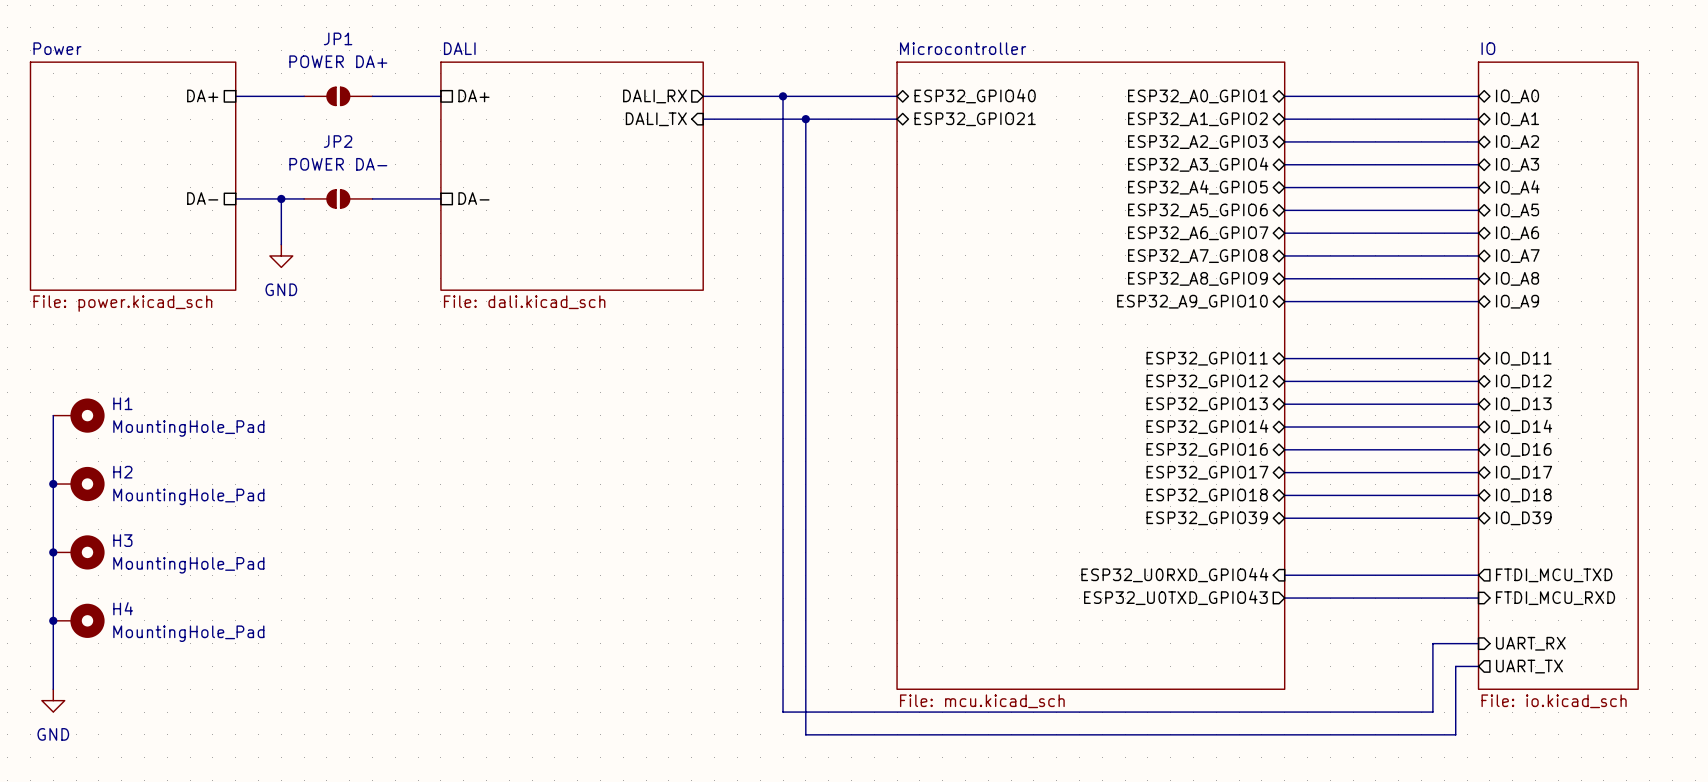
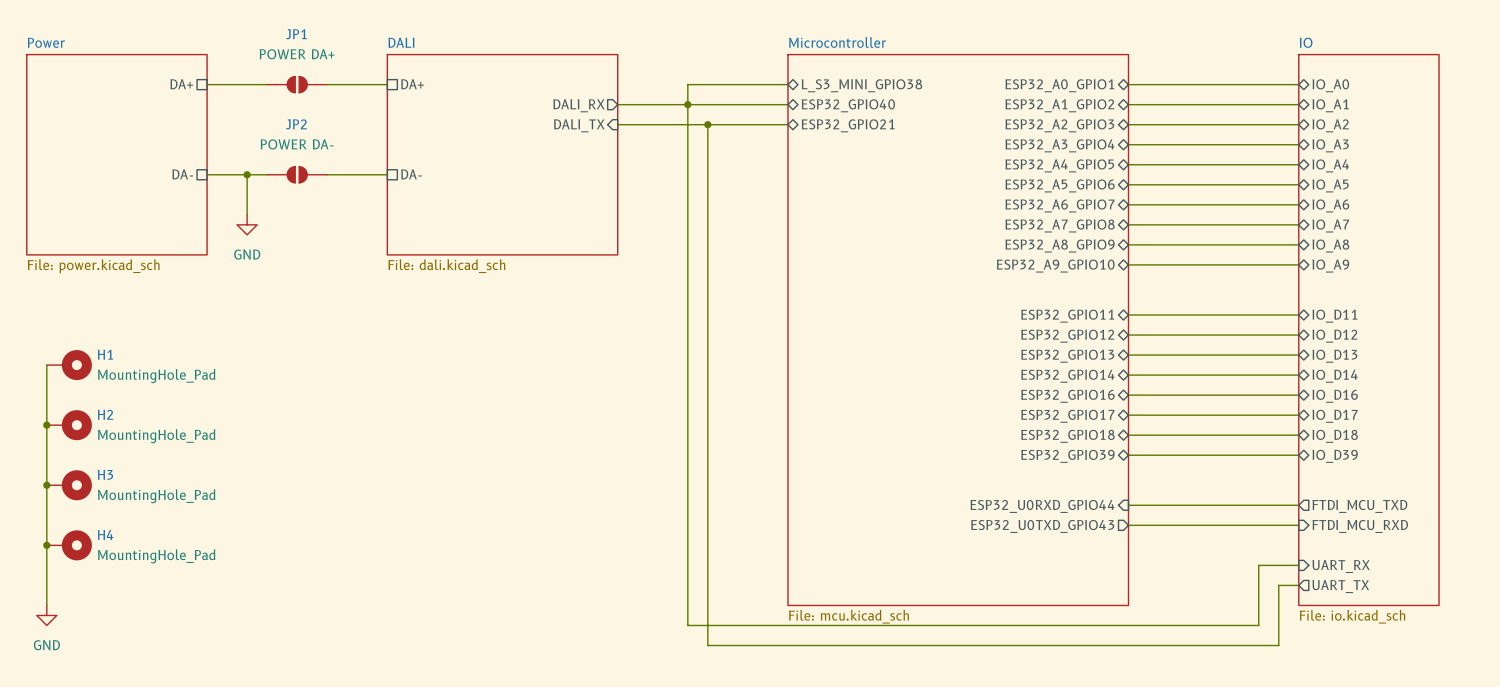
sheet pin: DALI_RX (654, 96) -> none
wire: (703, 96) (783, 96) -> none
junction: (783, 96) -> none
sheet pin: ESP32_GPIO40 (975, 96) -> L_S3_MINI_GPIO38 (861, 85)
sheet pin shape: input (656, 119) -> output (578, 105)
sheet pin: DALI_TX (656, 119) -> DALI_RX (578, 105)
junction: none -> (687, 104)
wire: (805, 119) (805, 141) -> none
junction: (805, 119) -> none
sheet pin: ESP32_GPIO21 (975, 119) -> ESP32_GPIO40 (848, 105)
wire: none -> (617, 124) (787, 124)
junction: none -> (707, 124)
sheet pin: none -> DALI_TX (579, 125)
sheet pin: none -> ESP32_GPIO21 (848, 125)

